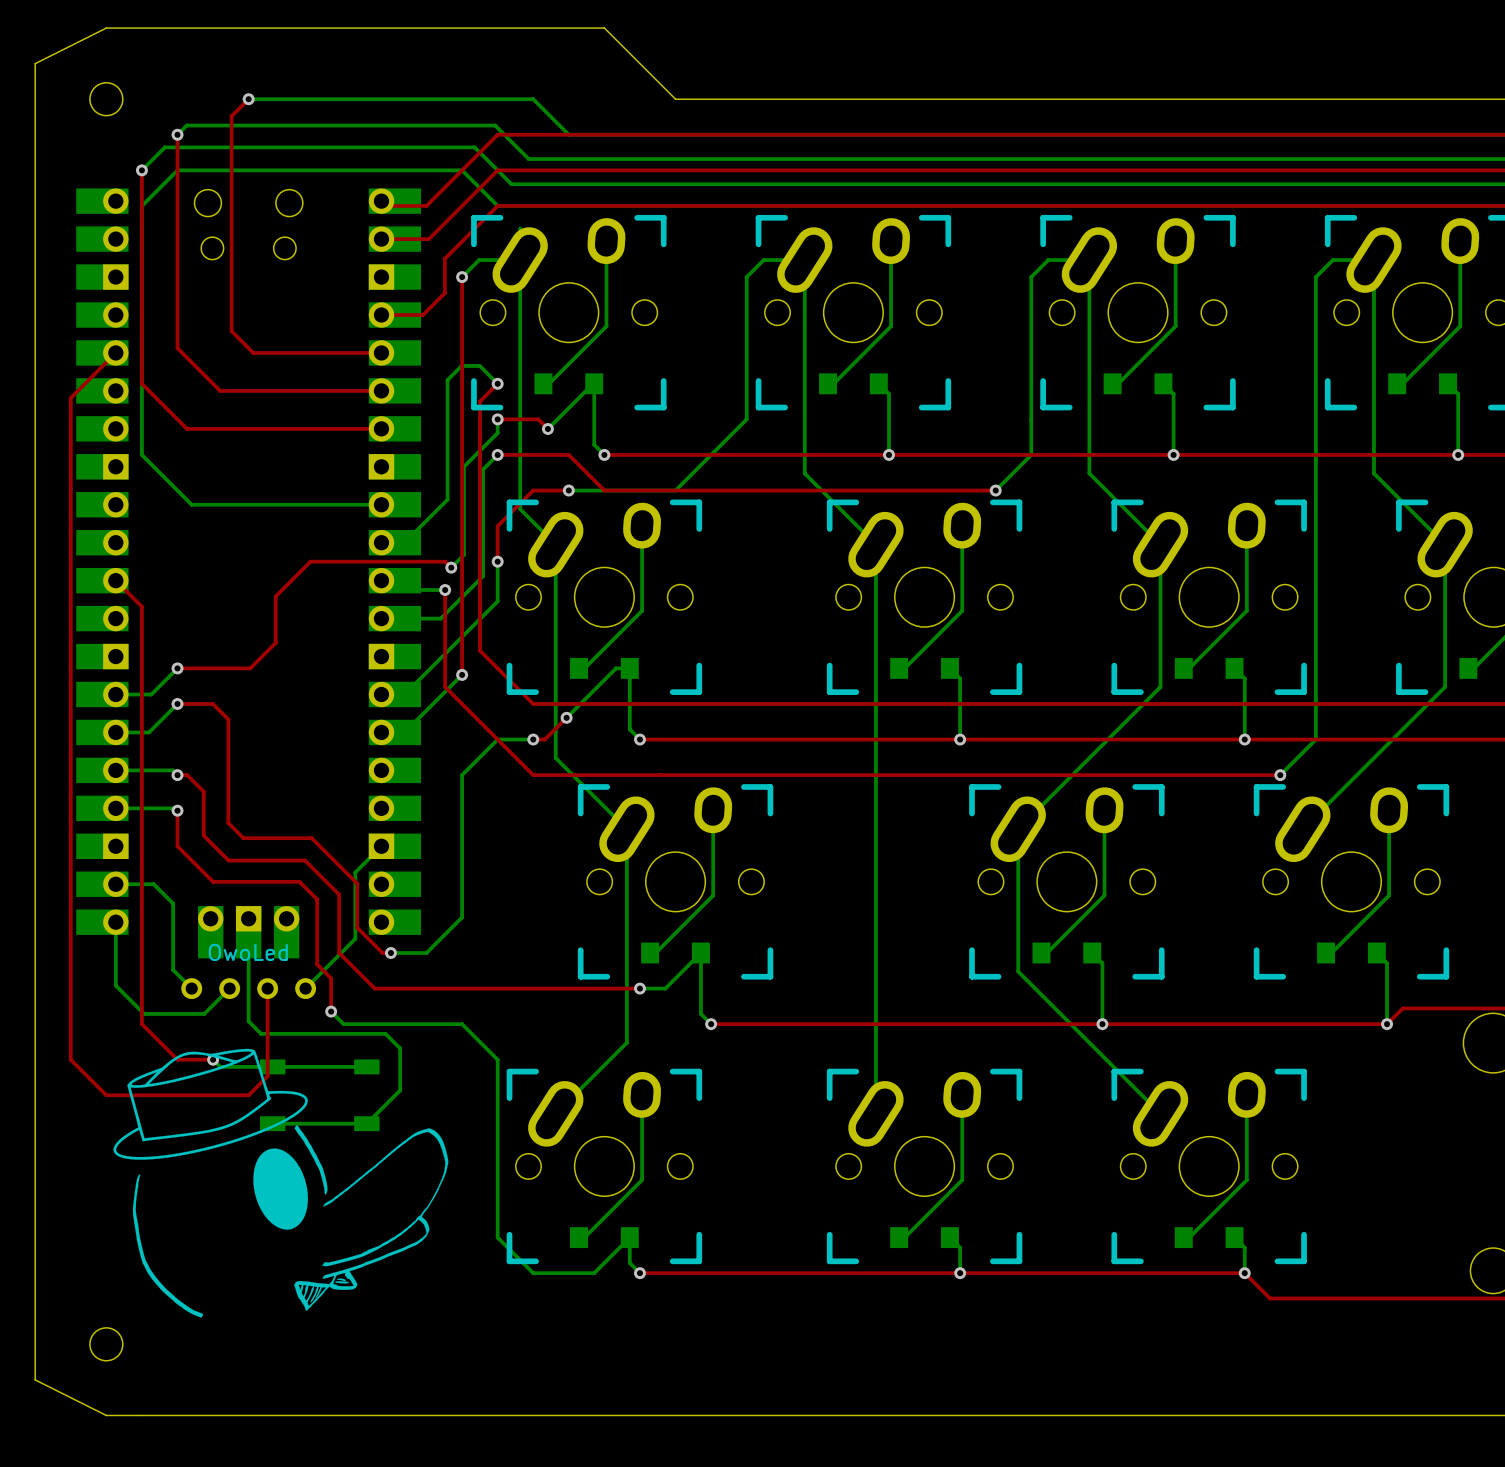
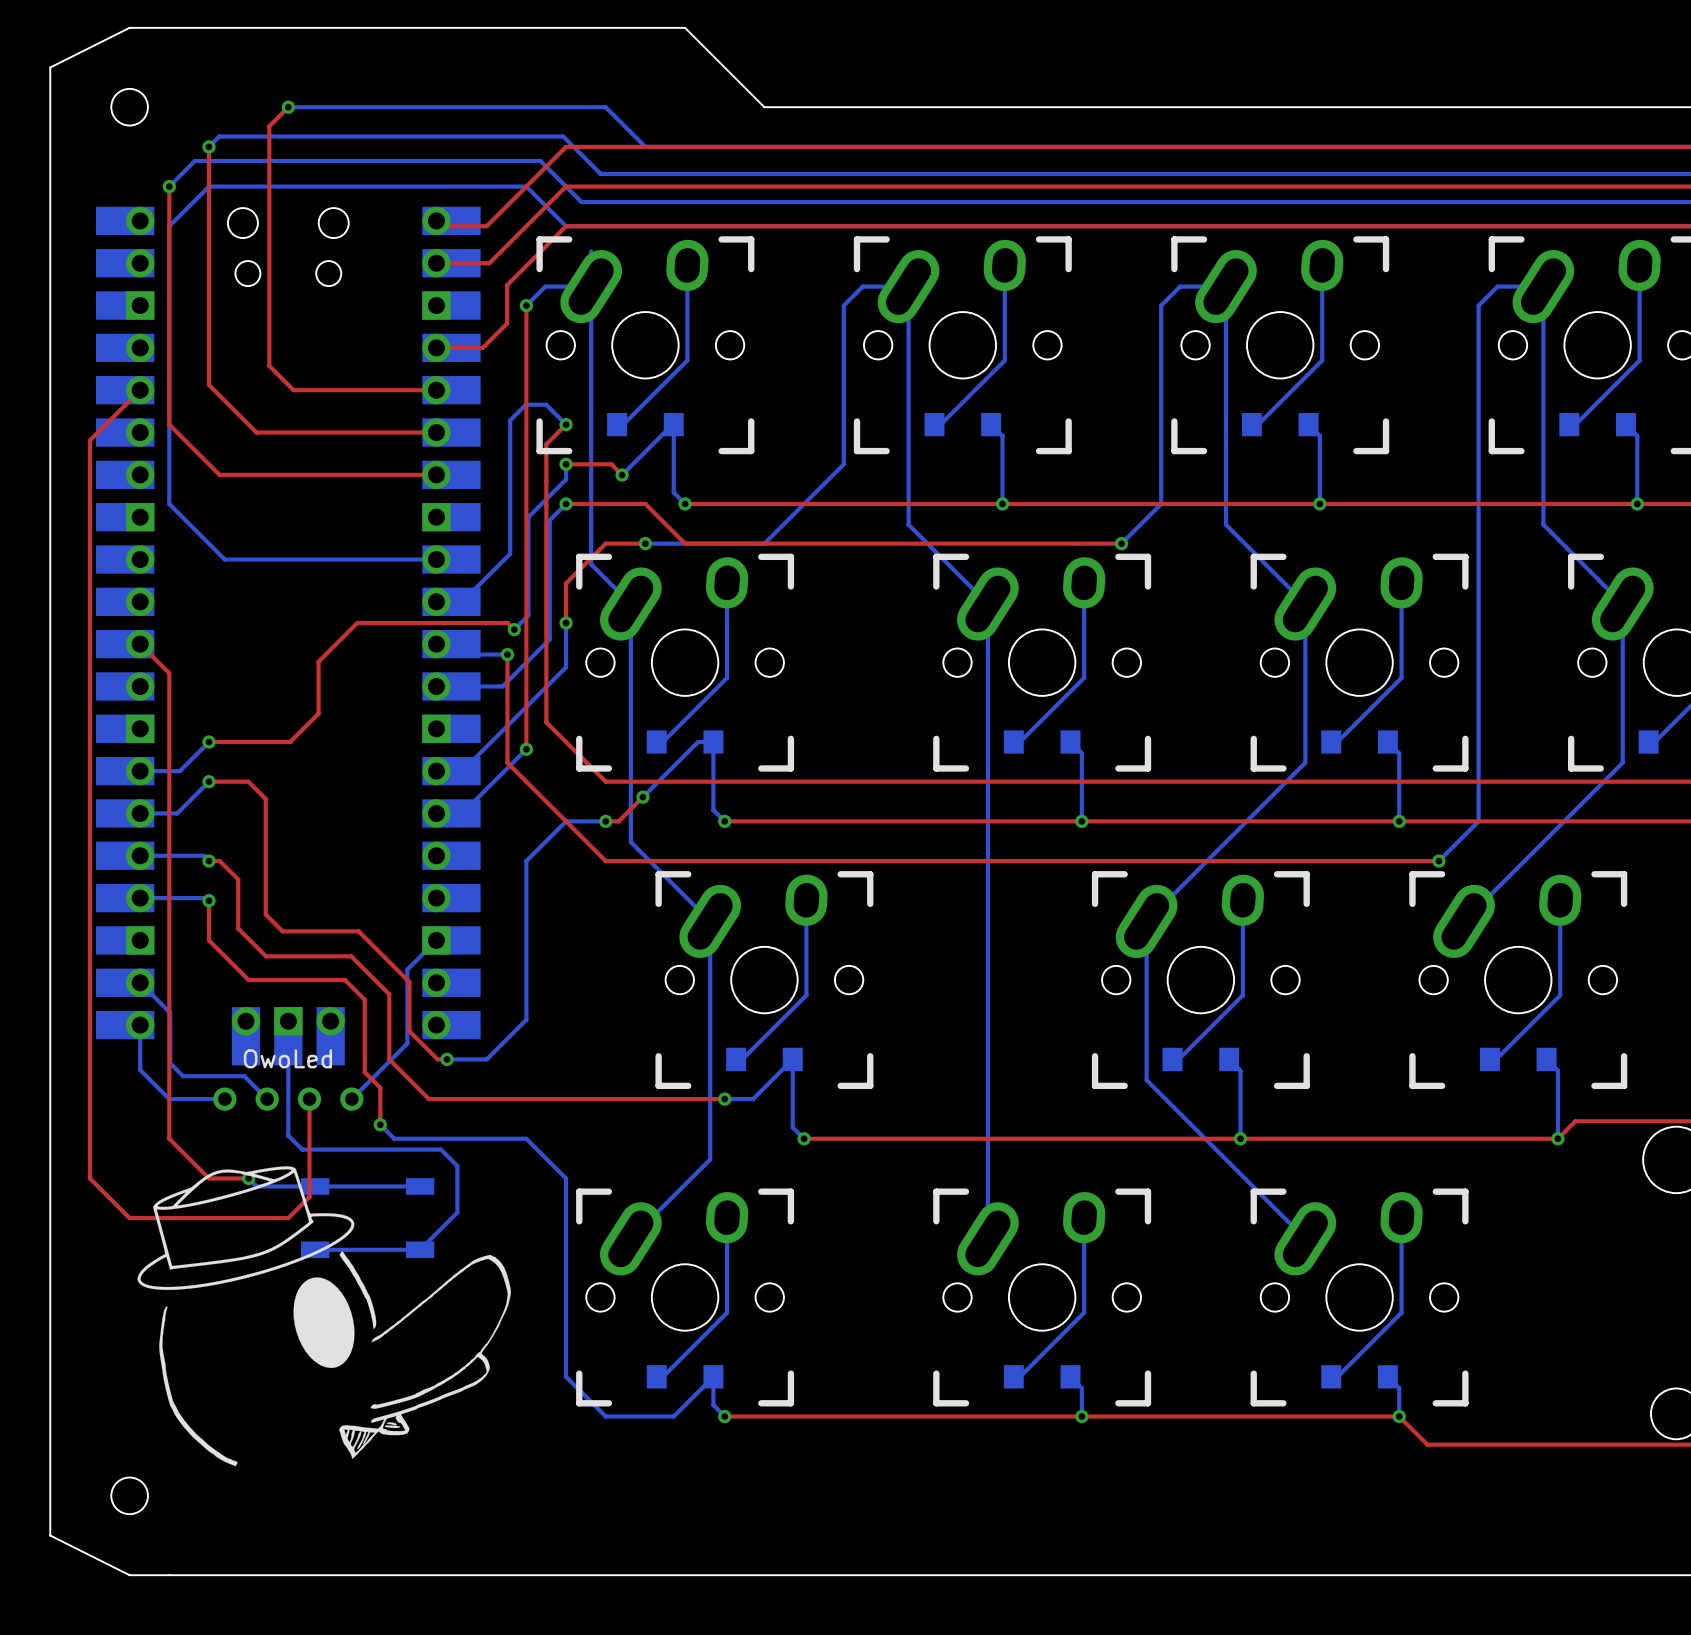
bottom track: (115, 884) (153, 884) (173, 903) (173, 970) (191, 988) -> (140, 982) (170, 1012) (170, 1063) (183, 1076) (244, 1076) (267, 1099)
bottom track: (115, 962) (115, 985) (144, 1013) (204, 1013) (229, 988) -> (140, 1069) (169, 1099) (224, 1099)

